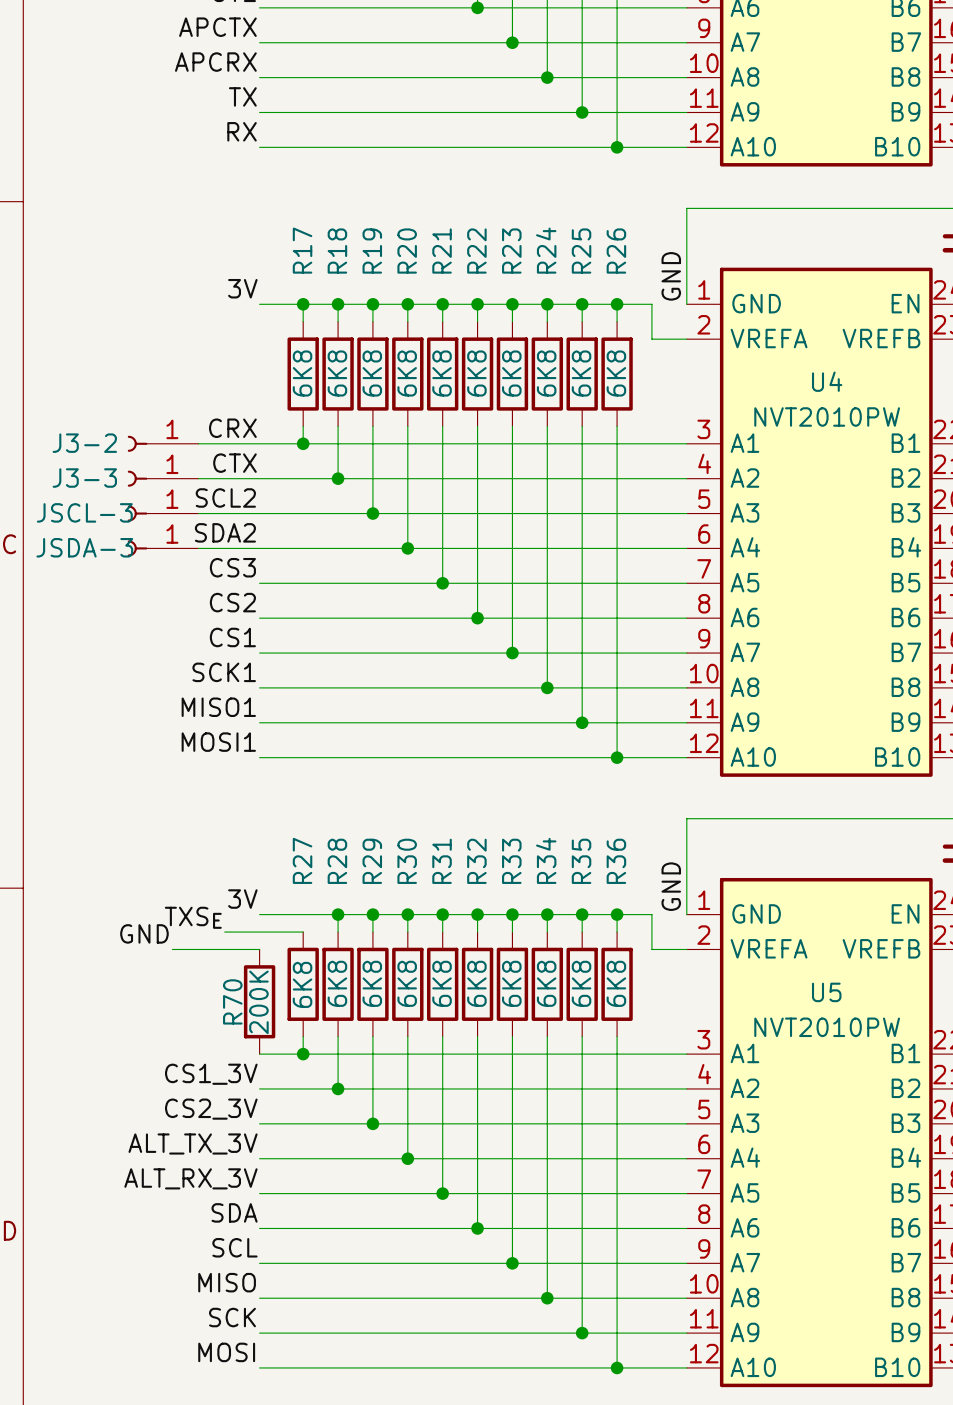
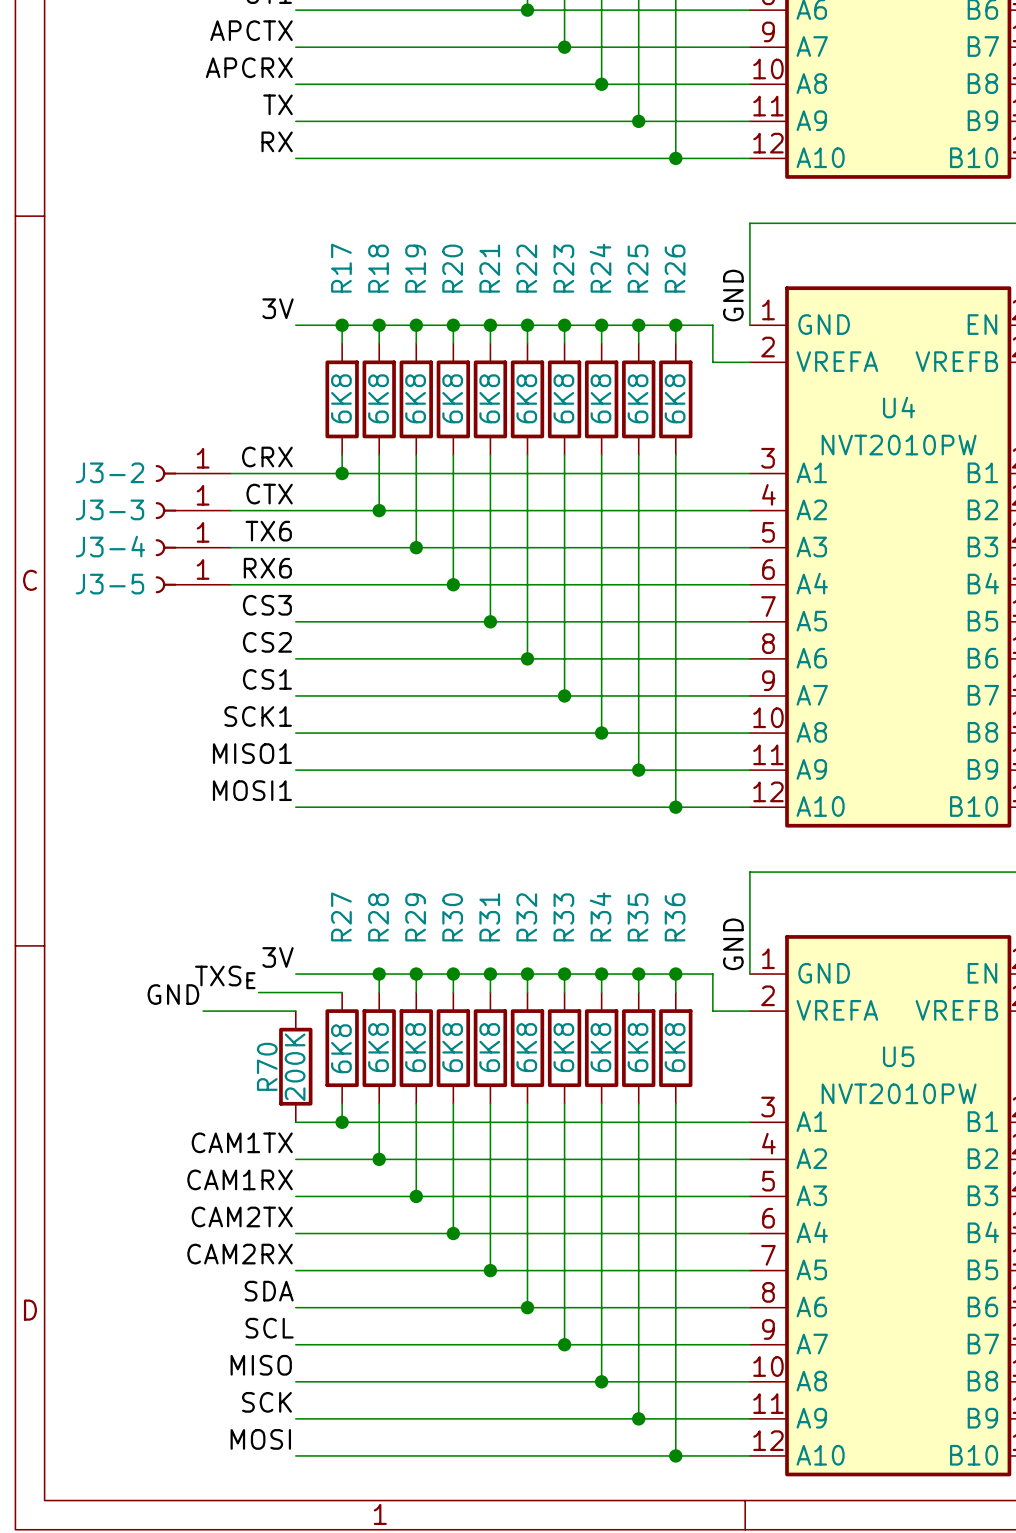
label: SCL2 (225, 497) -> TX6 (268, 531)
JSCL-3 name: JSCL-3 (84, 512) -> J3-4 (110, 546)
label: SDA2 (225, 532) -> RX6 (267, 568)
JSDA-3 name: JSDA-3 (84, 547) -> J3-5 (109, 584)
label: CS1_3V (211, 1074) -> CAM1TX (242, 1142)
label: CS2_3V (211, 1109) -> CAM1RX (240, 1179)
label: ALT_TX_3V (193, 1143) -> CAM2TX (242, 1216)
label: ALT_RX_3V (190, 1178) -> CAM2RX (240, 1254)

